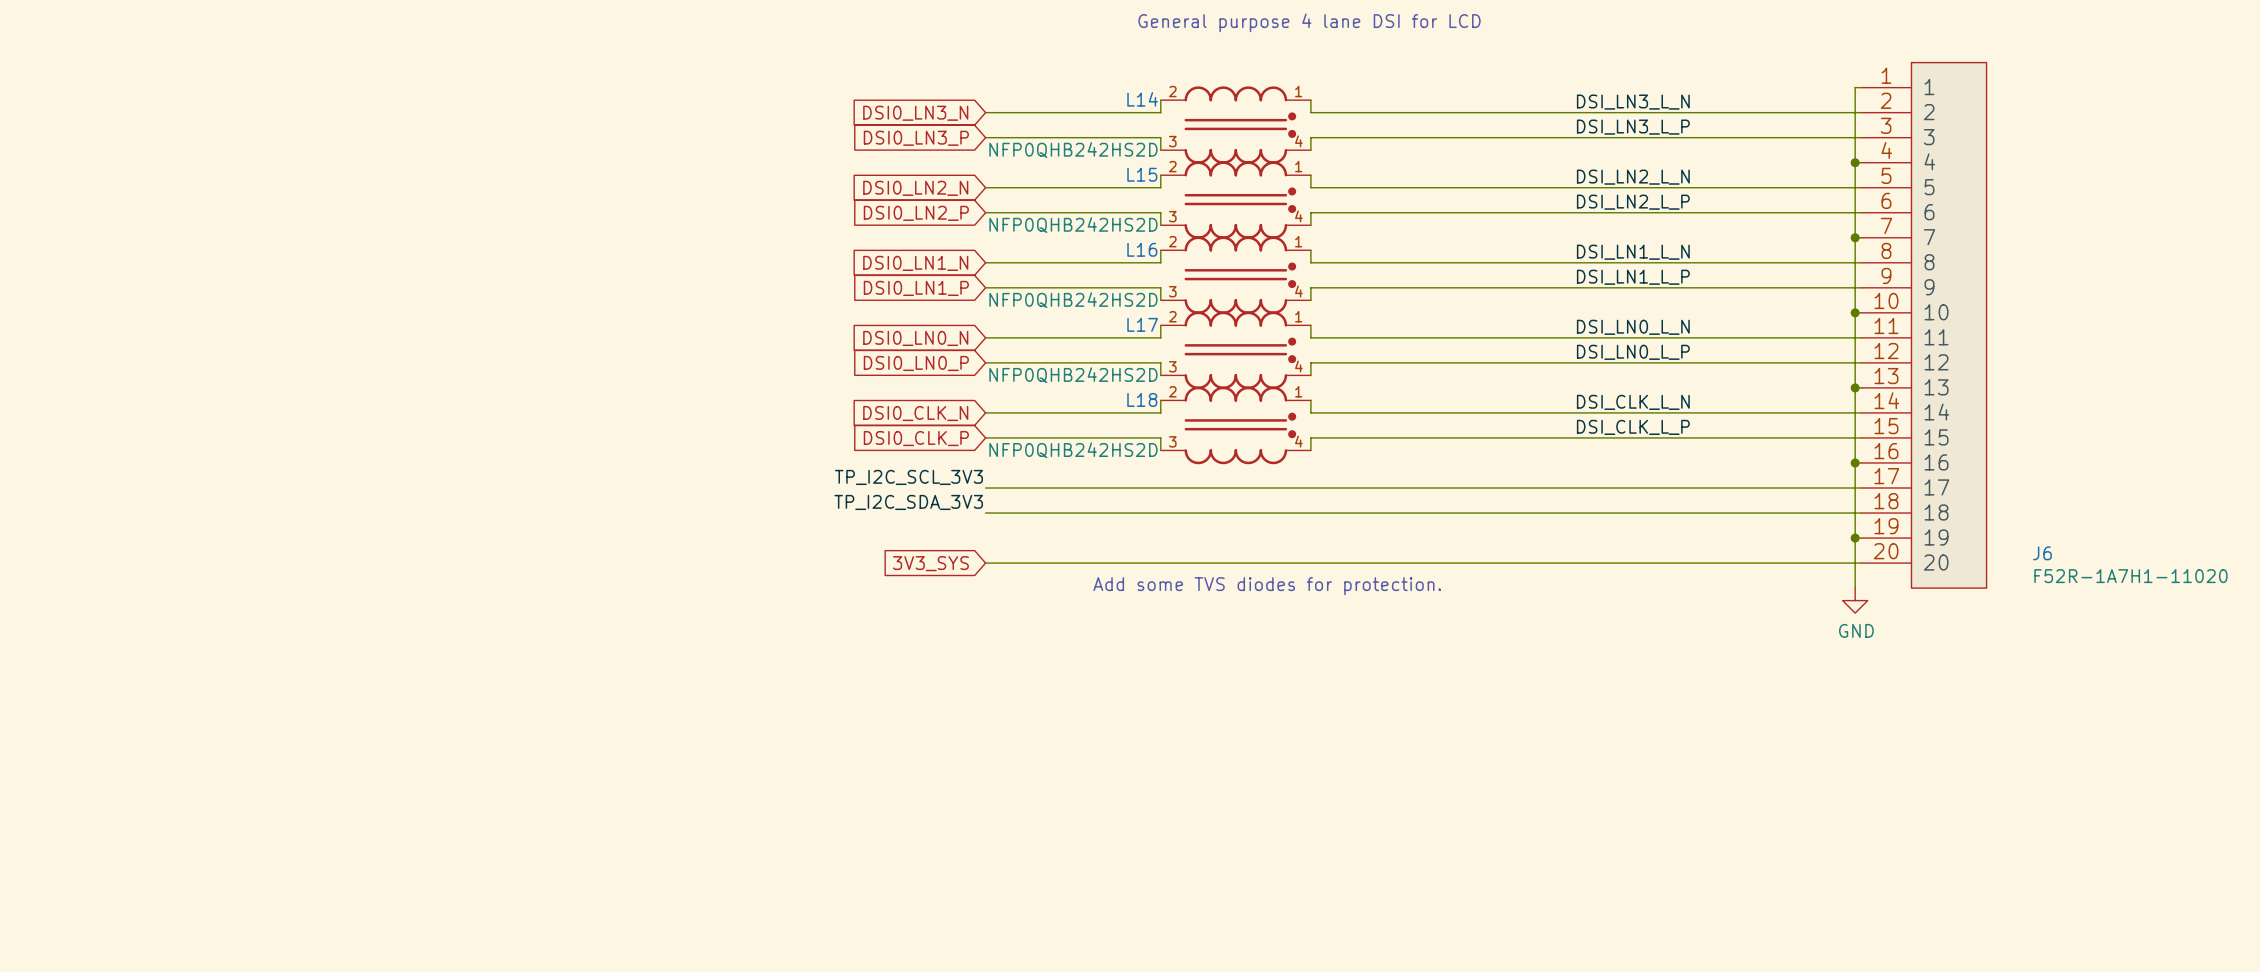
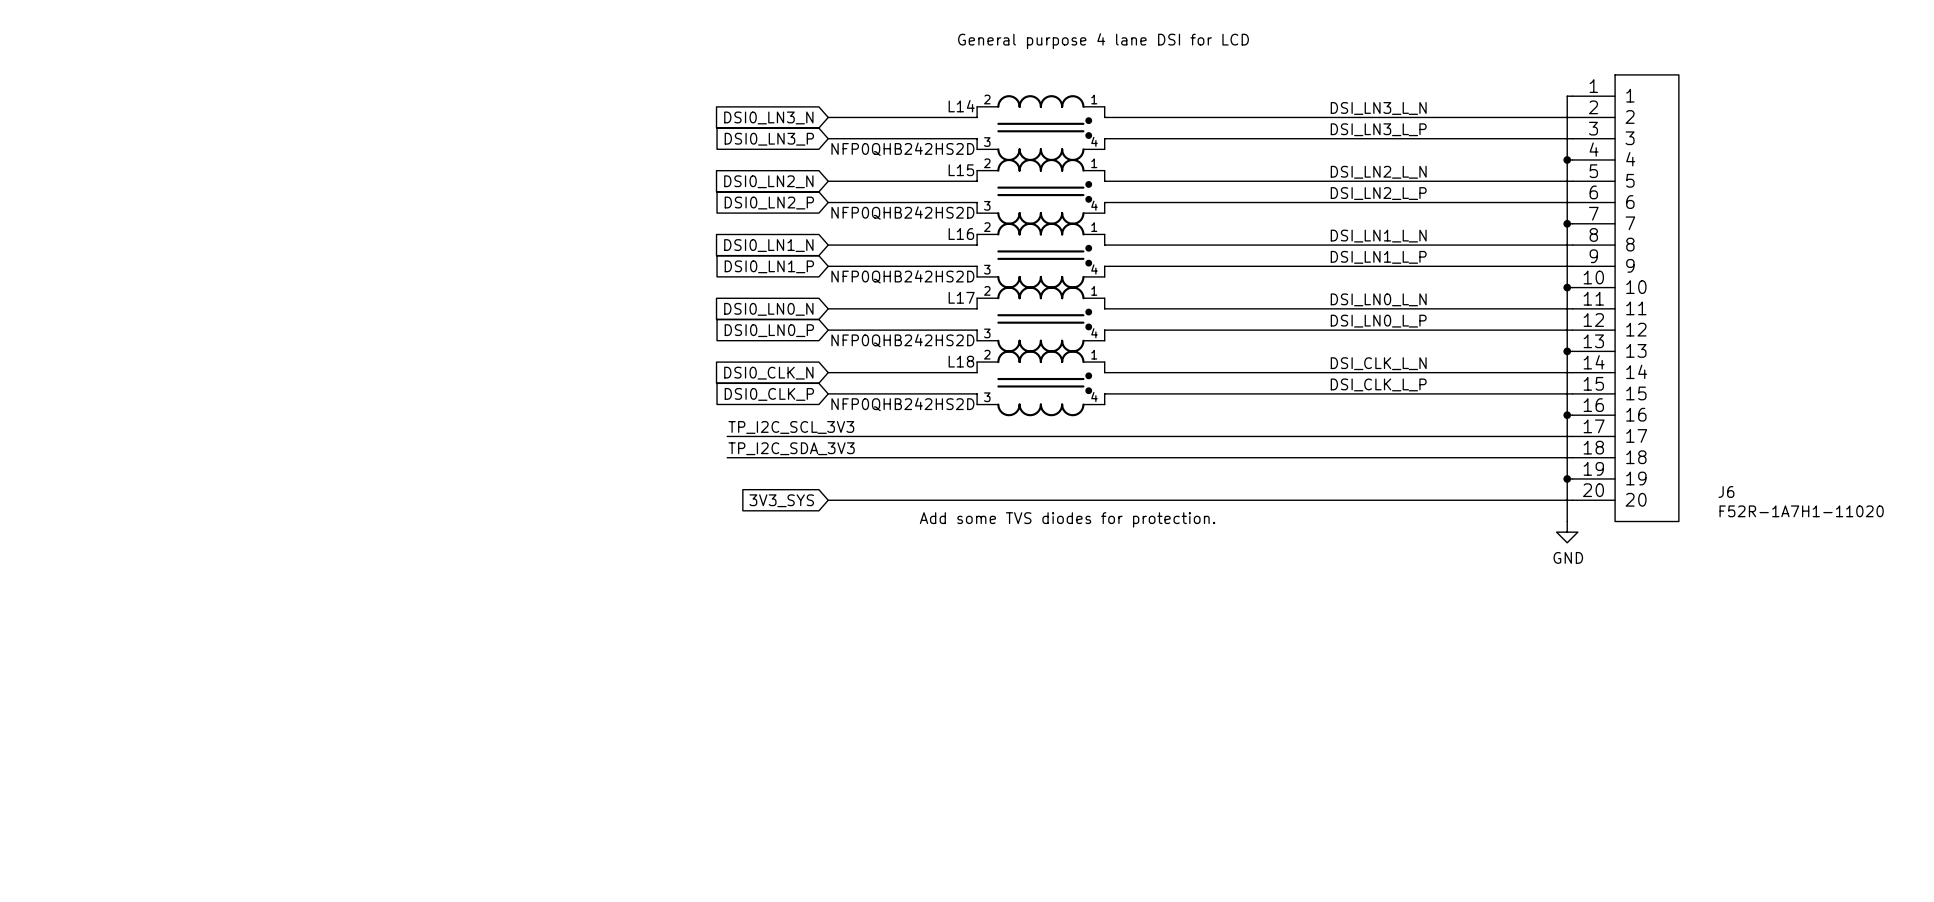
label position: TP_I2C_SCL_3V3 (908, 477) -> TP_I2C_SCL_3V3 (791, 427)
wire: none -> (727, 436) (828, 436)
label position: TP_I2C_SDA_3V3 (908, 502) -> TP_I2C_SDA_3V3 (791, 448)
wire: none -> (727, 457) (828, 457)

